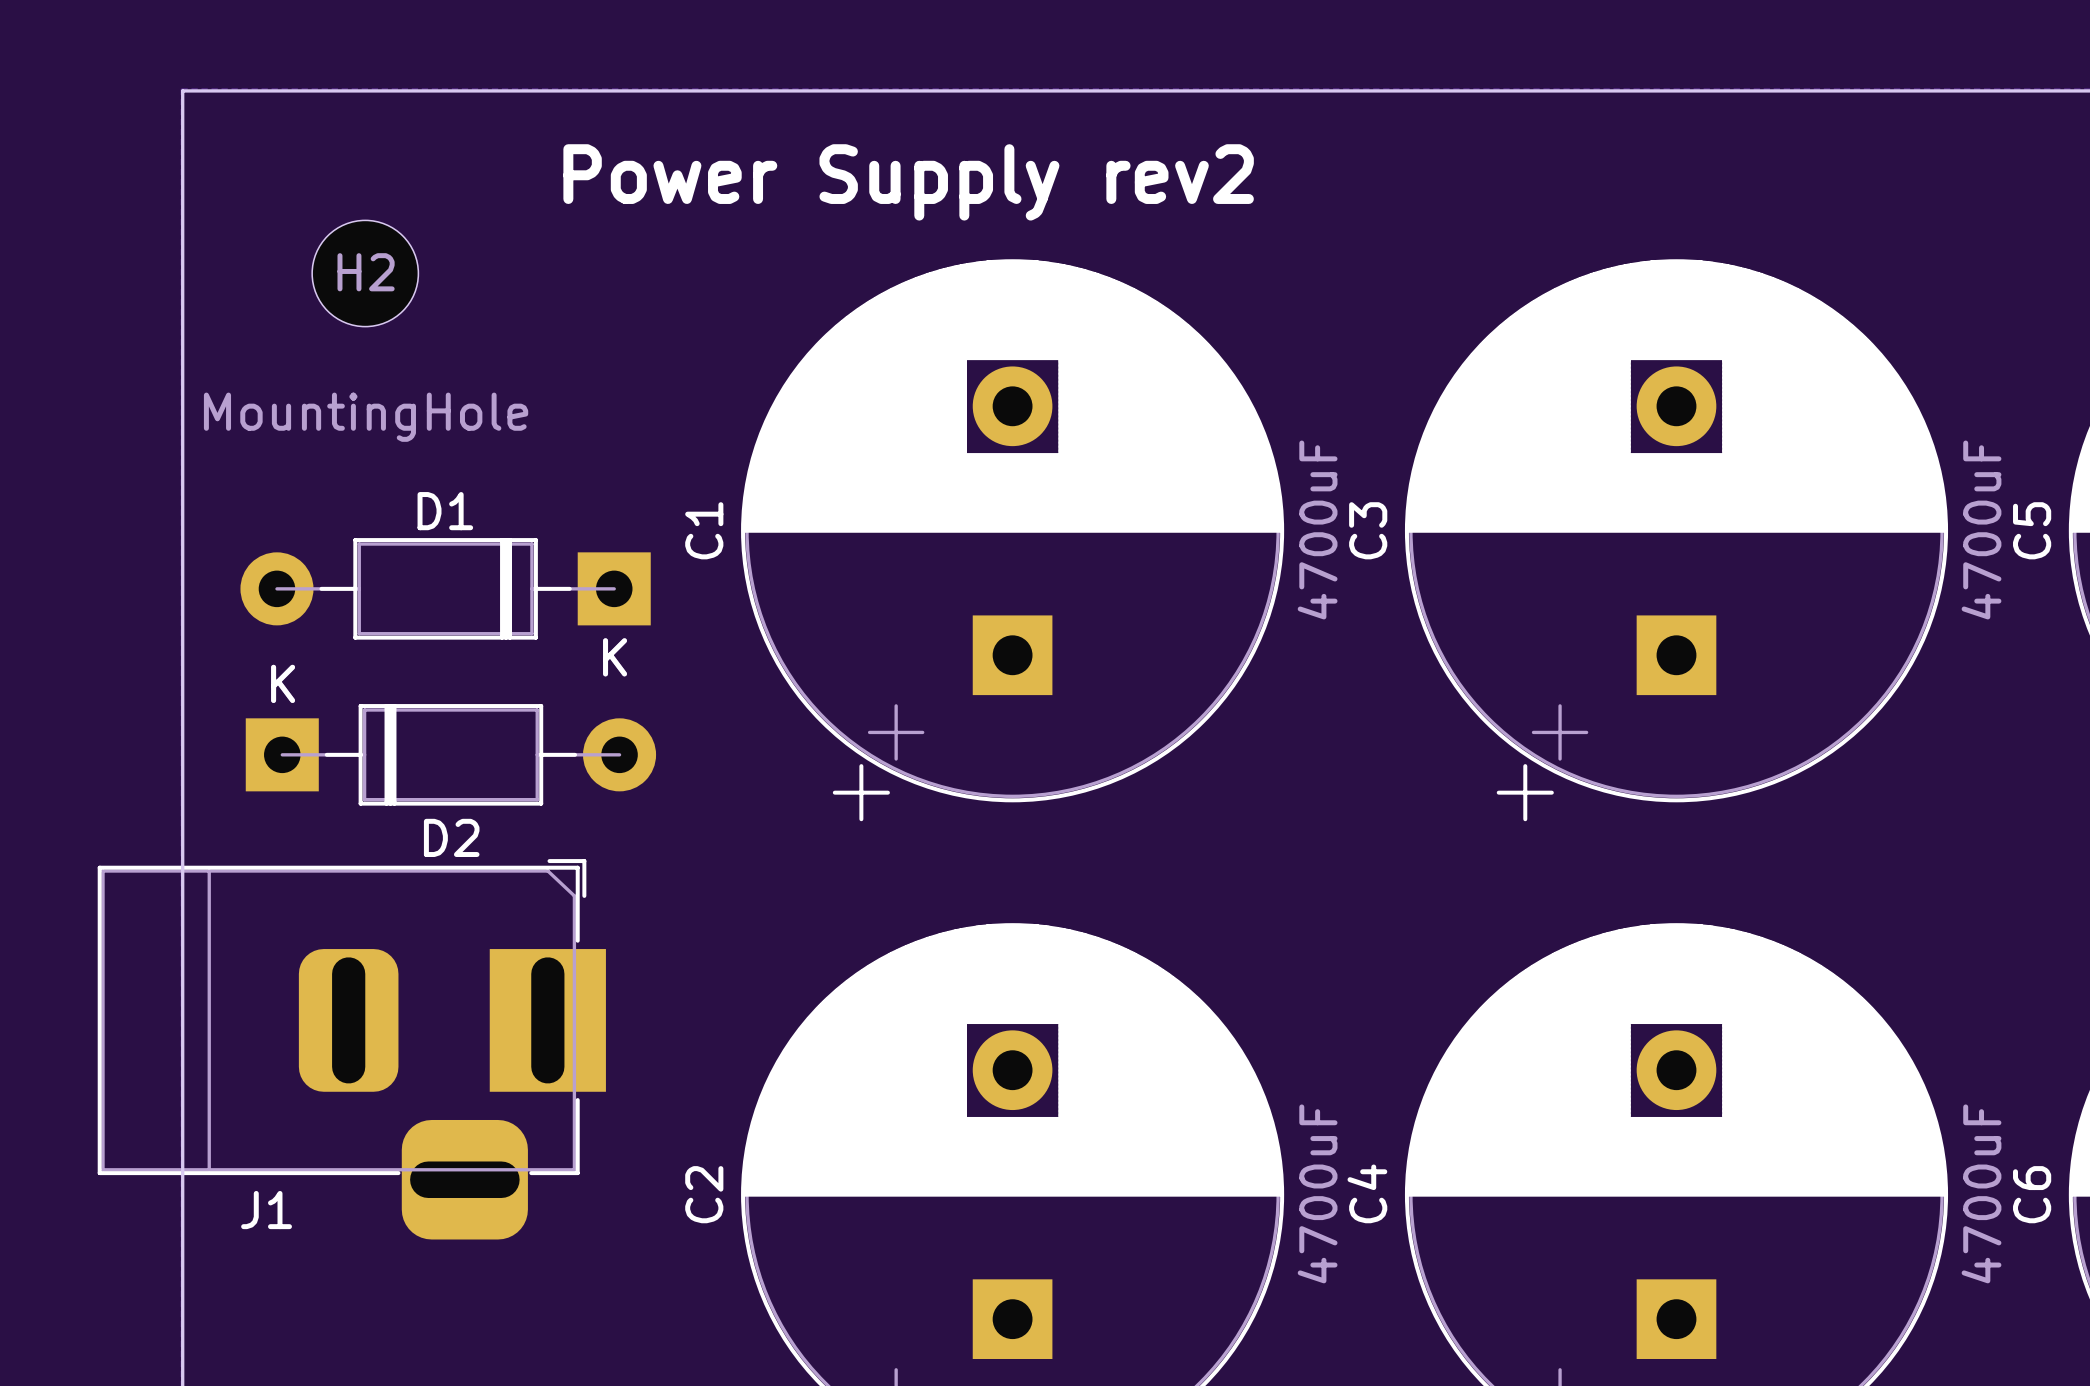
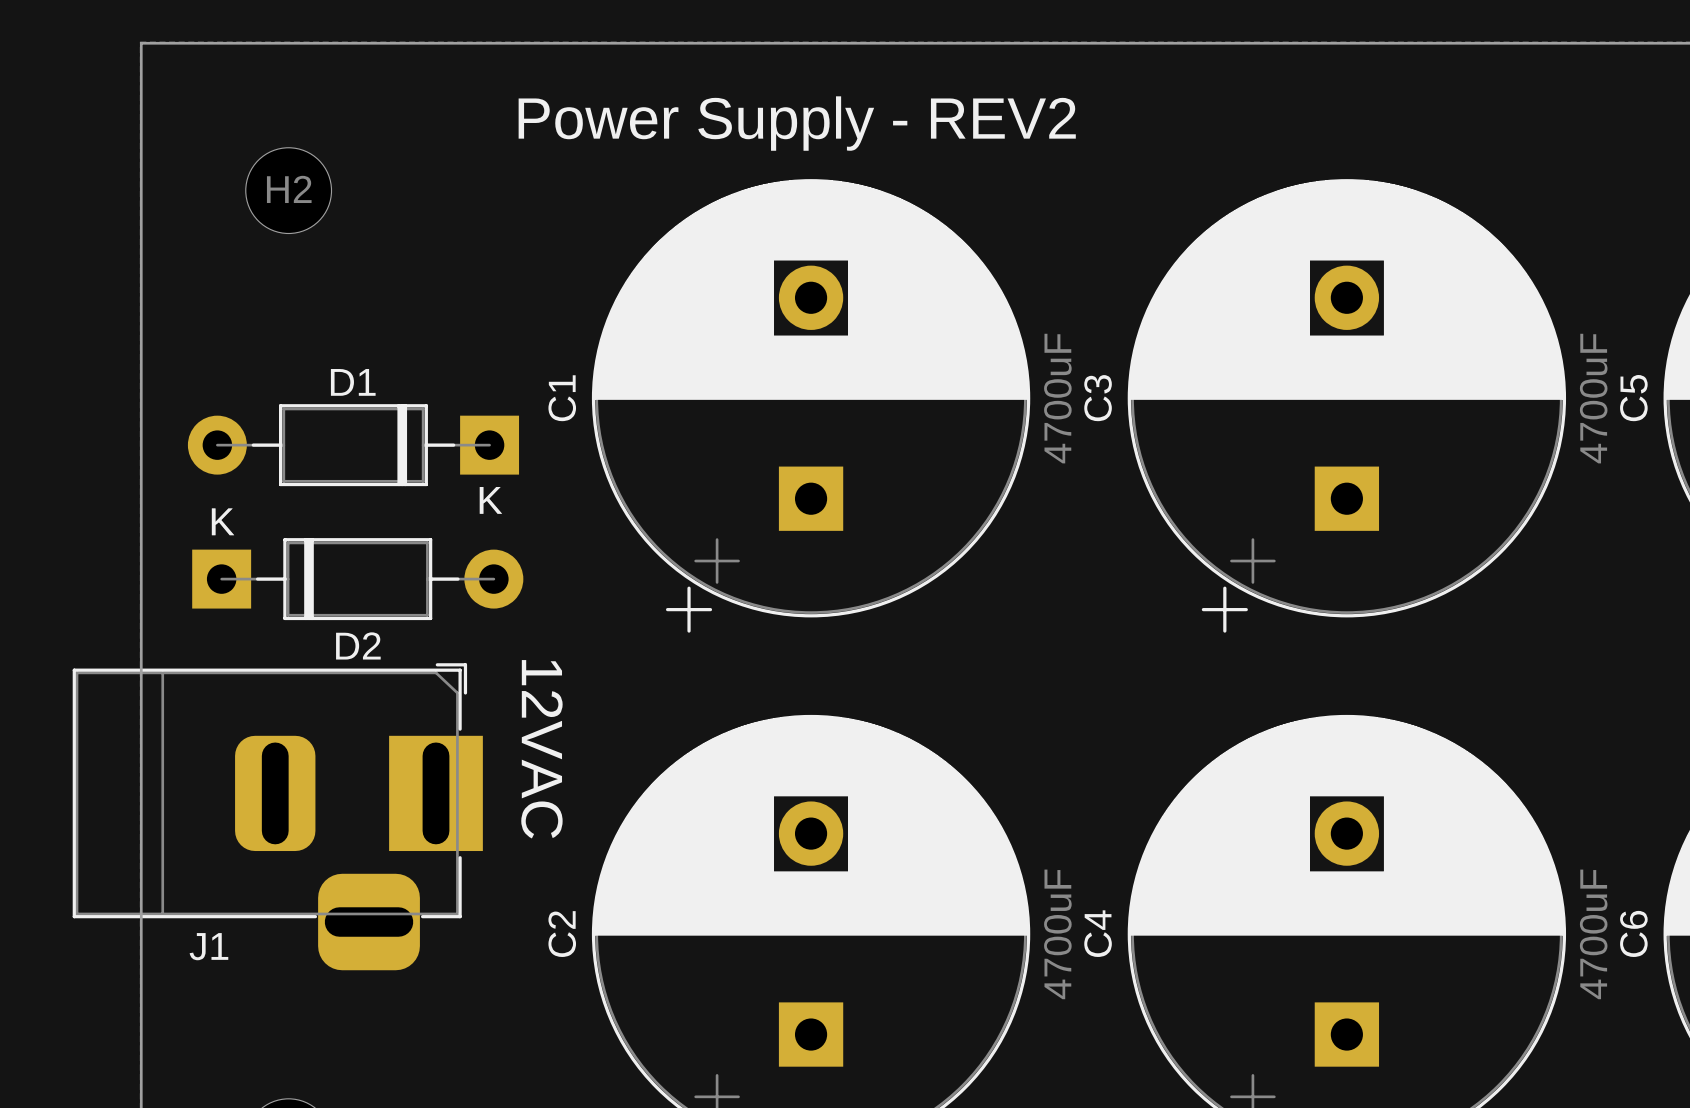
text: Power Supply rev2 (908, 182) -> Power Supply - REV2 (797, 123)
H2 value: MountingHole (366, 417) -> none
text: none -> 12VAC (541, 749)

